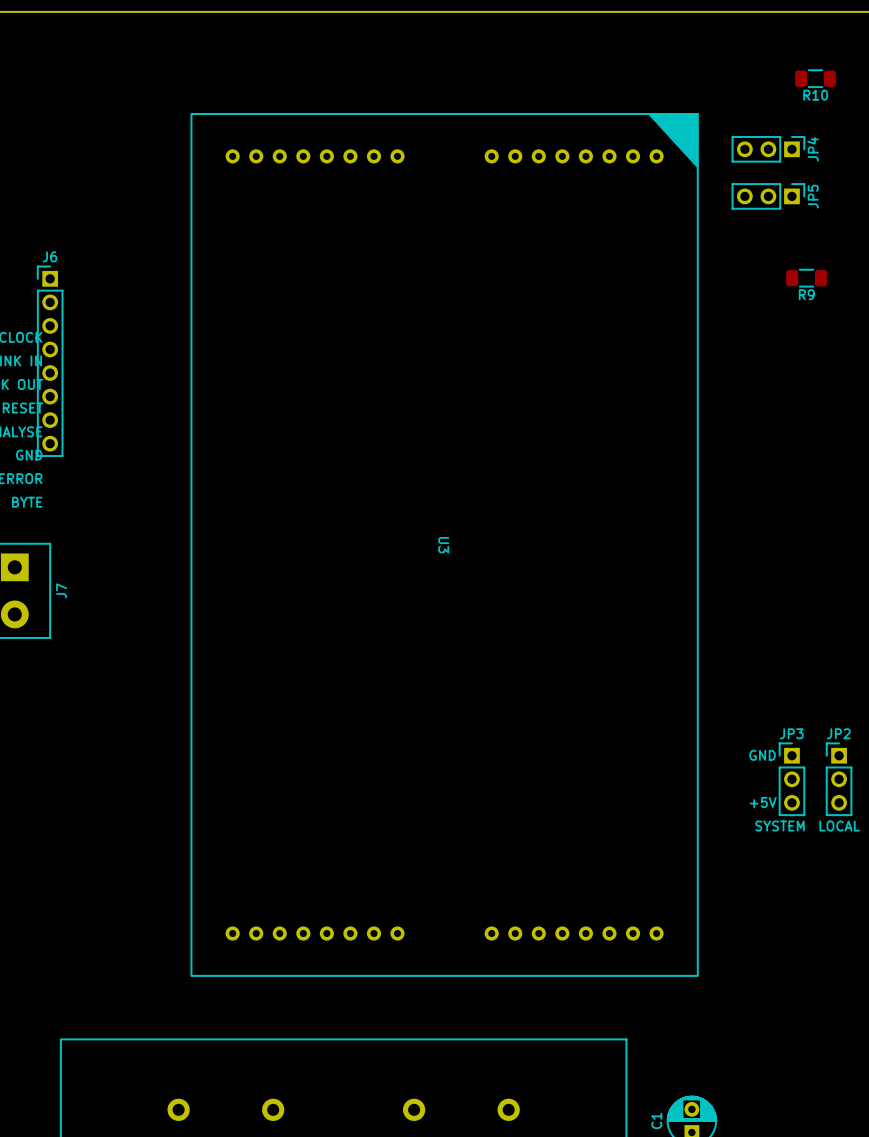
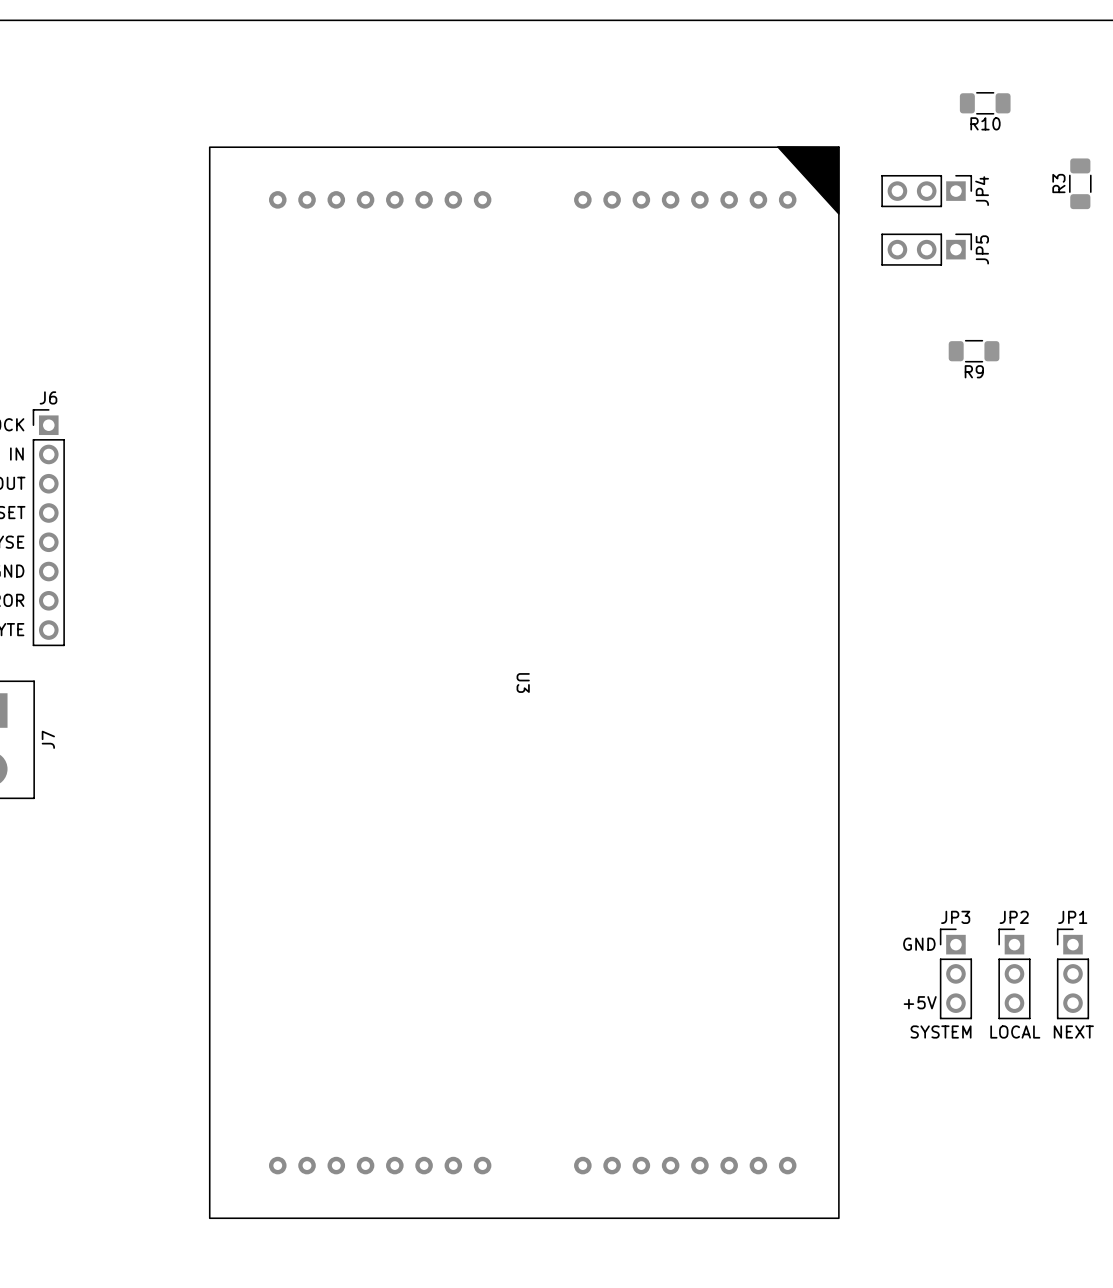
U3 footprint: [190, 113, 699, 977] -> [209, 146, 840, 1219]
J6 position: (50, 361) -> (48, 527)

